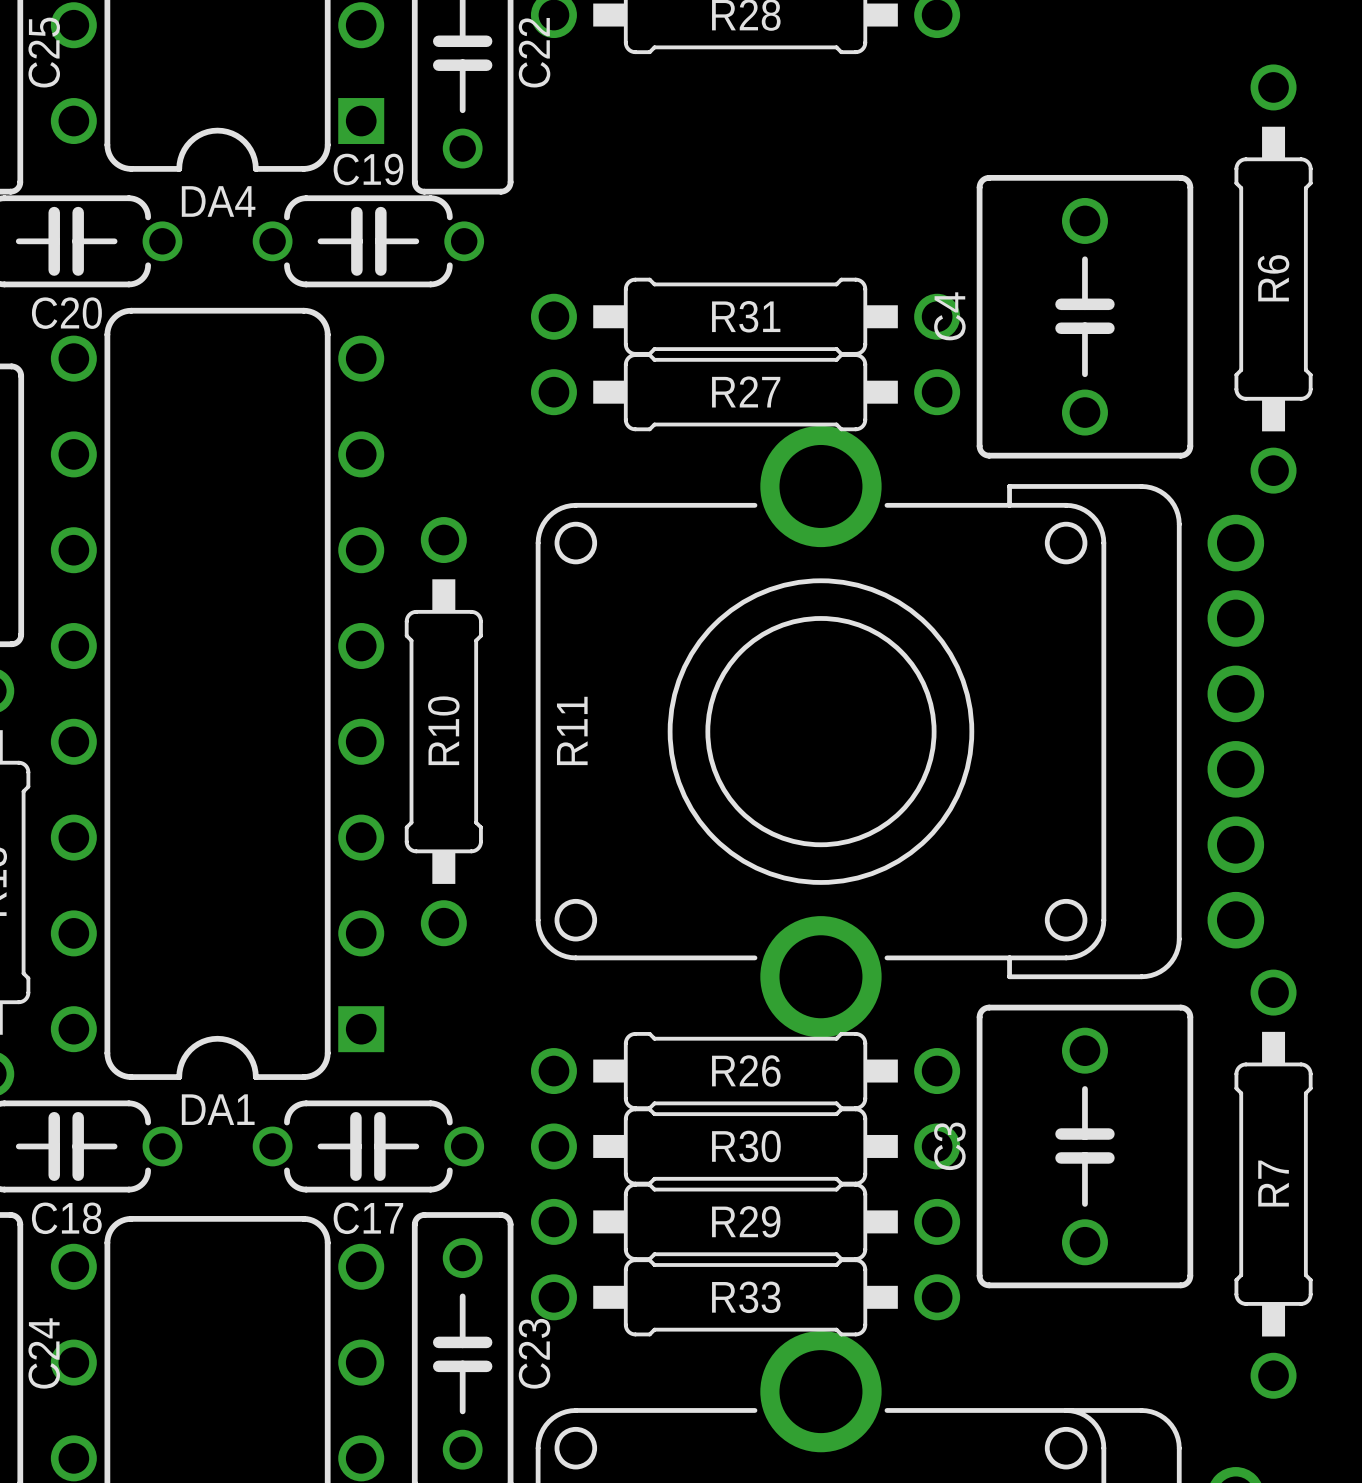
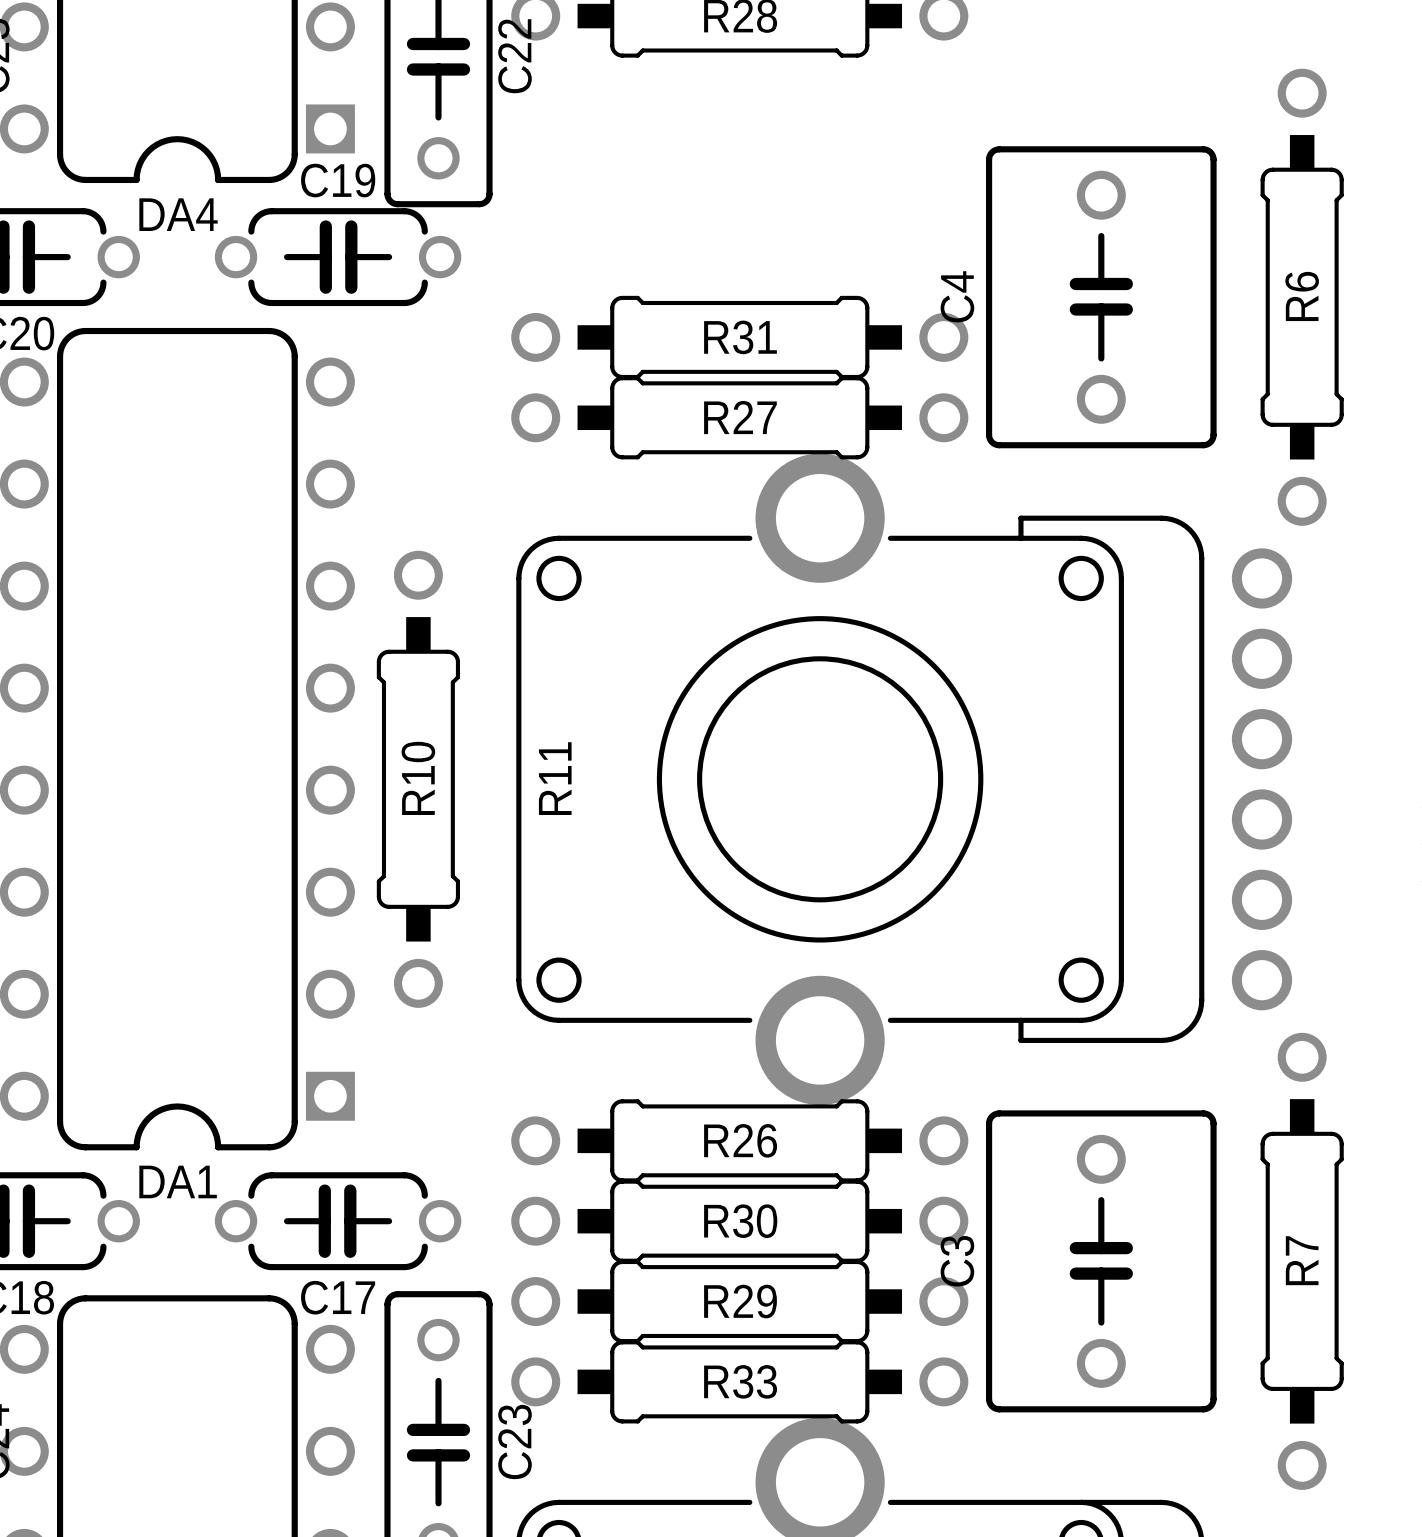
C4 position: (1084, 316) -> (1101, 297)
C3 position: (1084, 1146) -> (1101, 1261)

